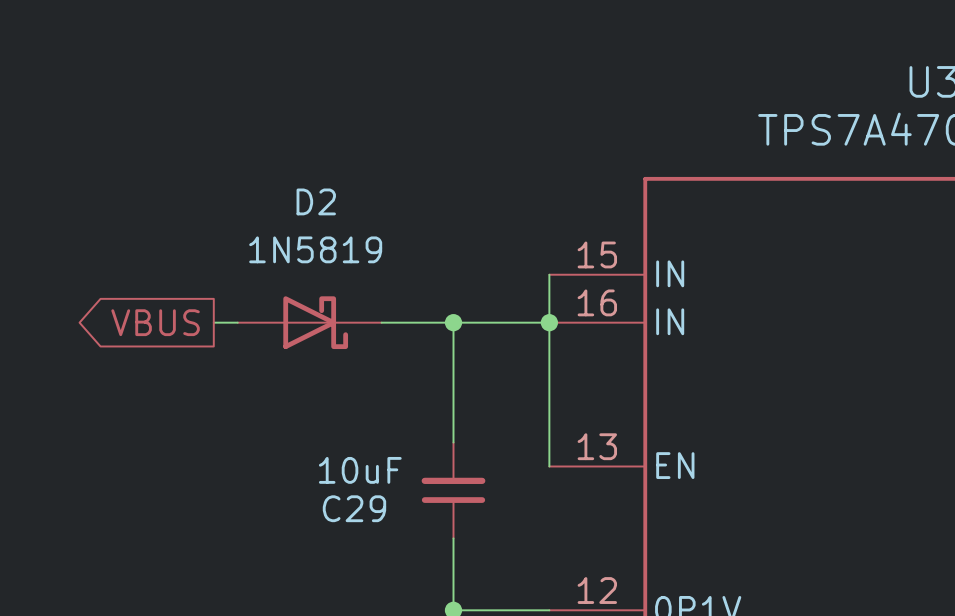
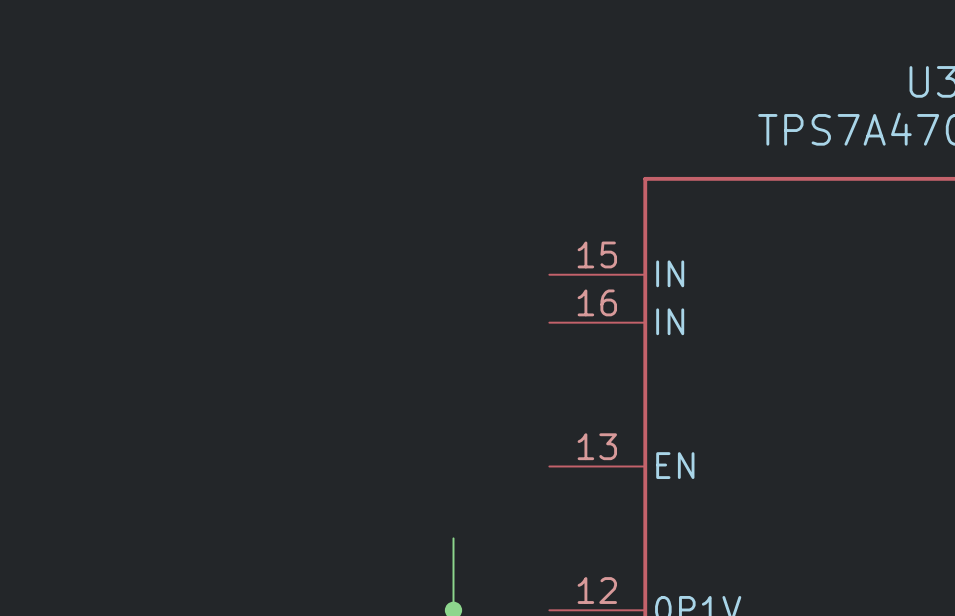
wire: (549, 274) (549, 466) -> none
global label: VBUS (155, 322) -> none
wire: (213, 322) (237, 322) -> none
D2: 1N5819 (309, 322) -> none
wire: (381, 322) (549, 322) -> none
wire: (453, 322) (453, 442) -> none
junction: (453, 322) -> none
junction: (549, 322) -> none
C29: 10uF (453, 490) -> none
wire: (453, 610) (549, 610) -> none

